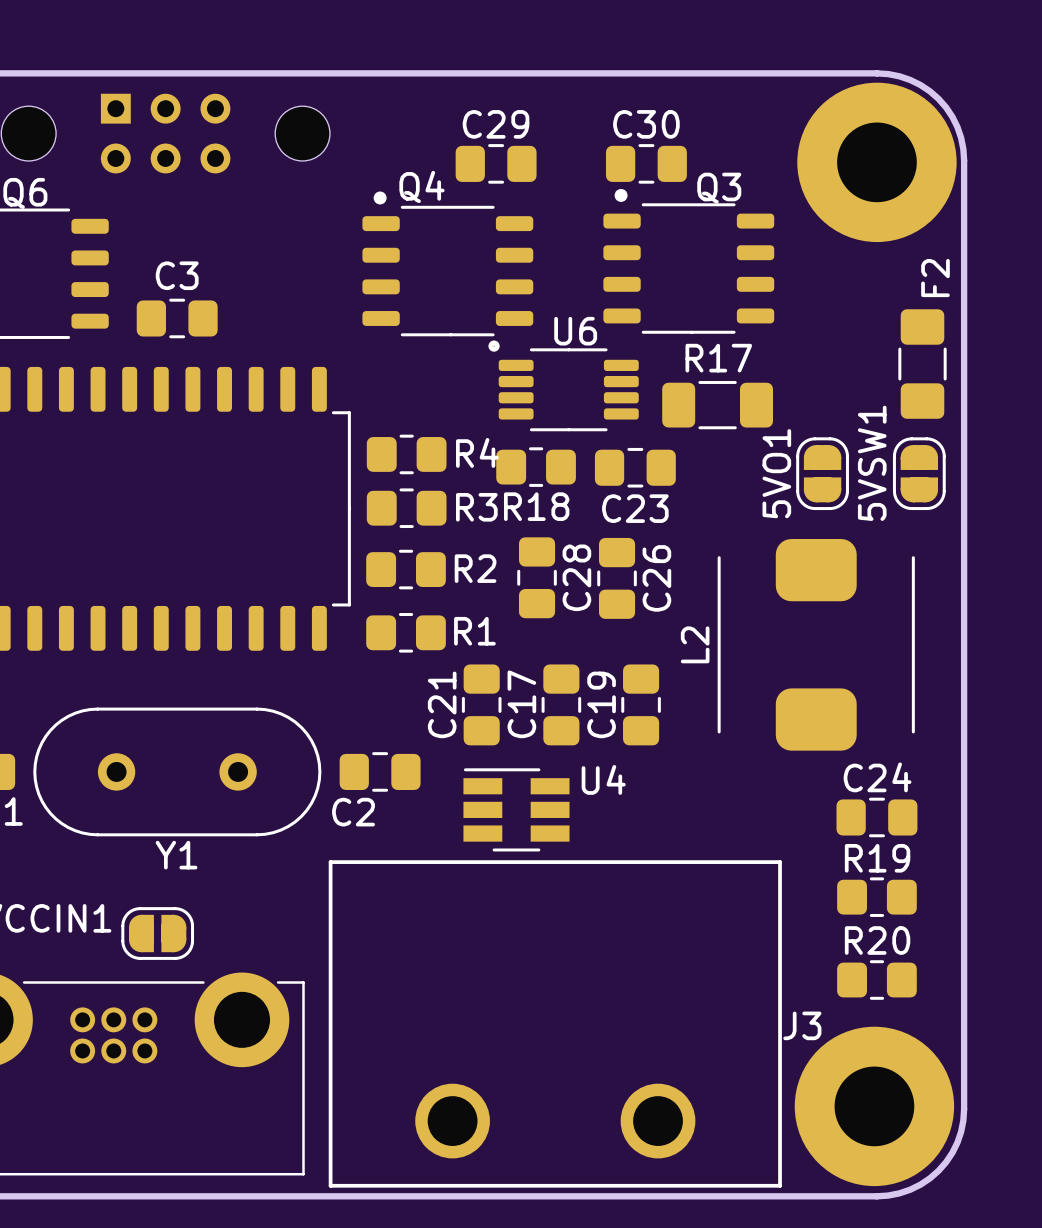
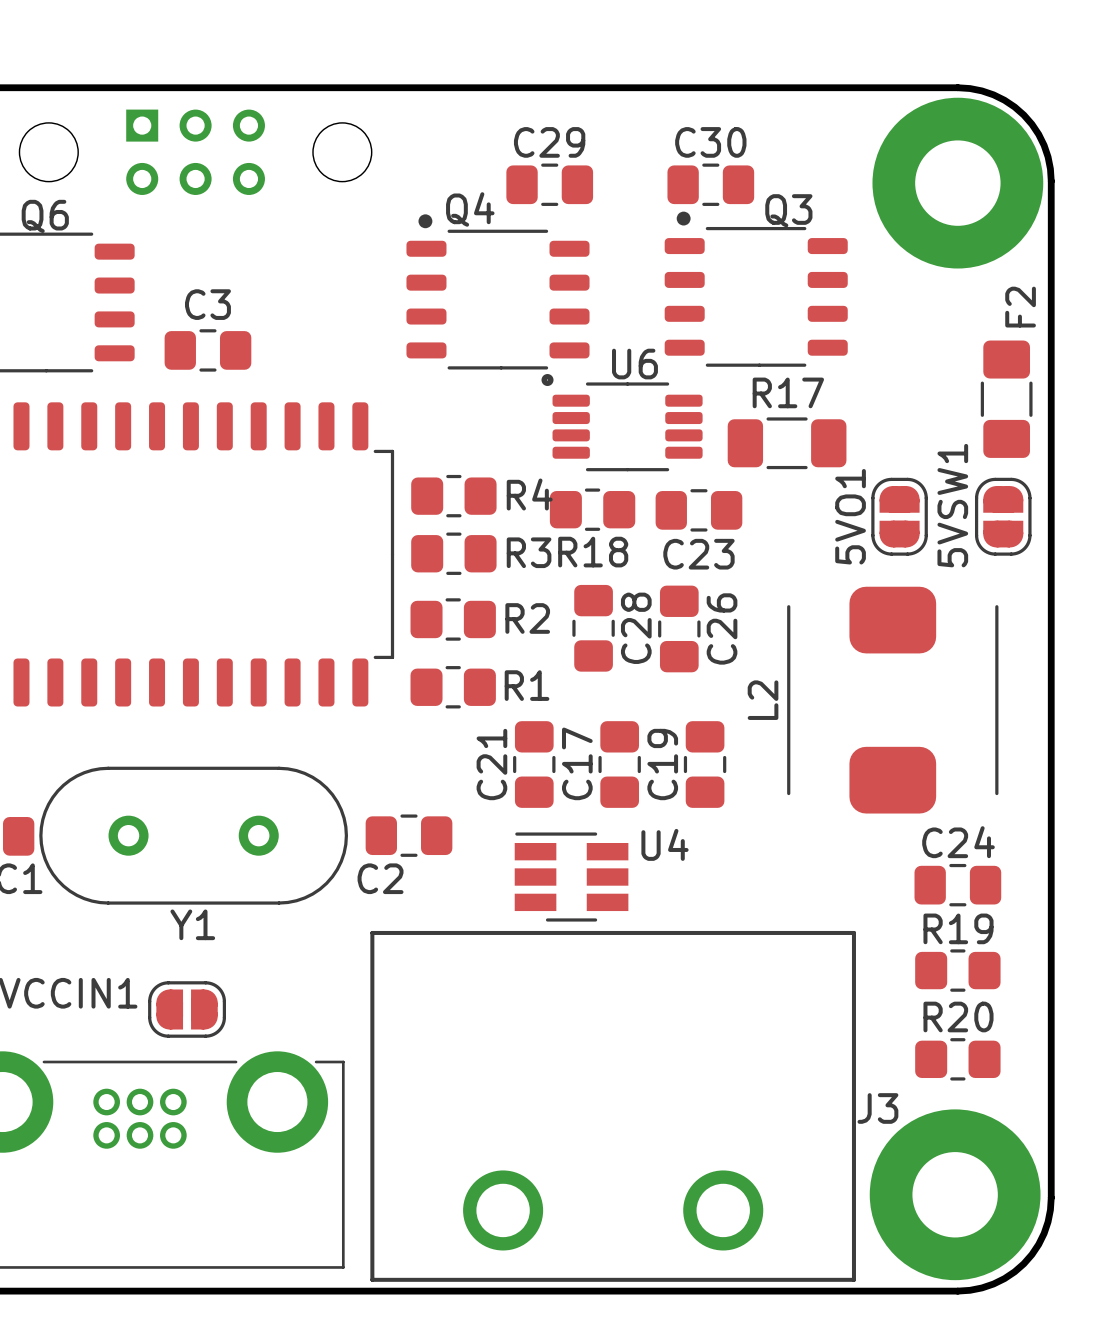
Y1 position: (177, 771) -> (193, 835)
C2 position: (380, 771) -> (409, 835)

